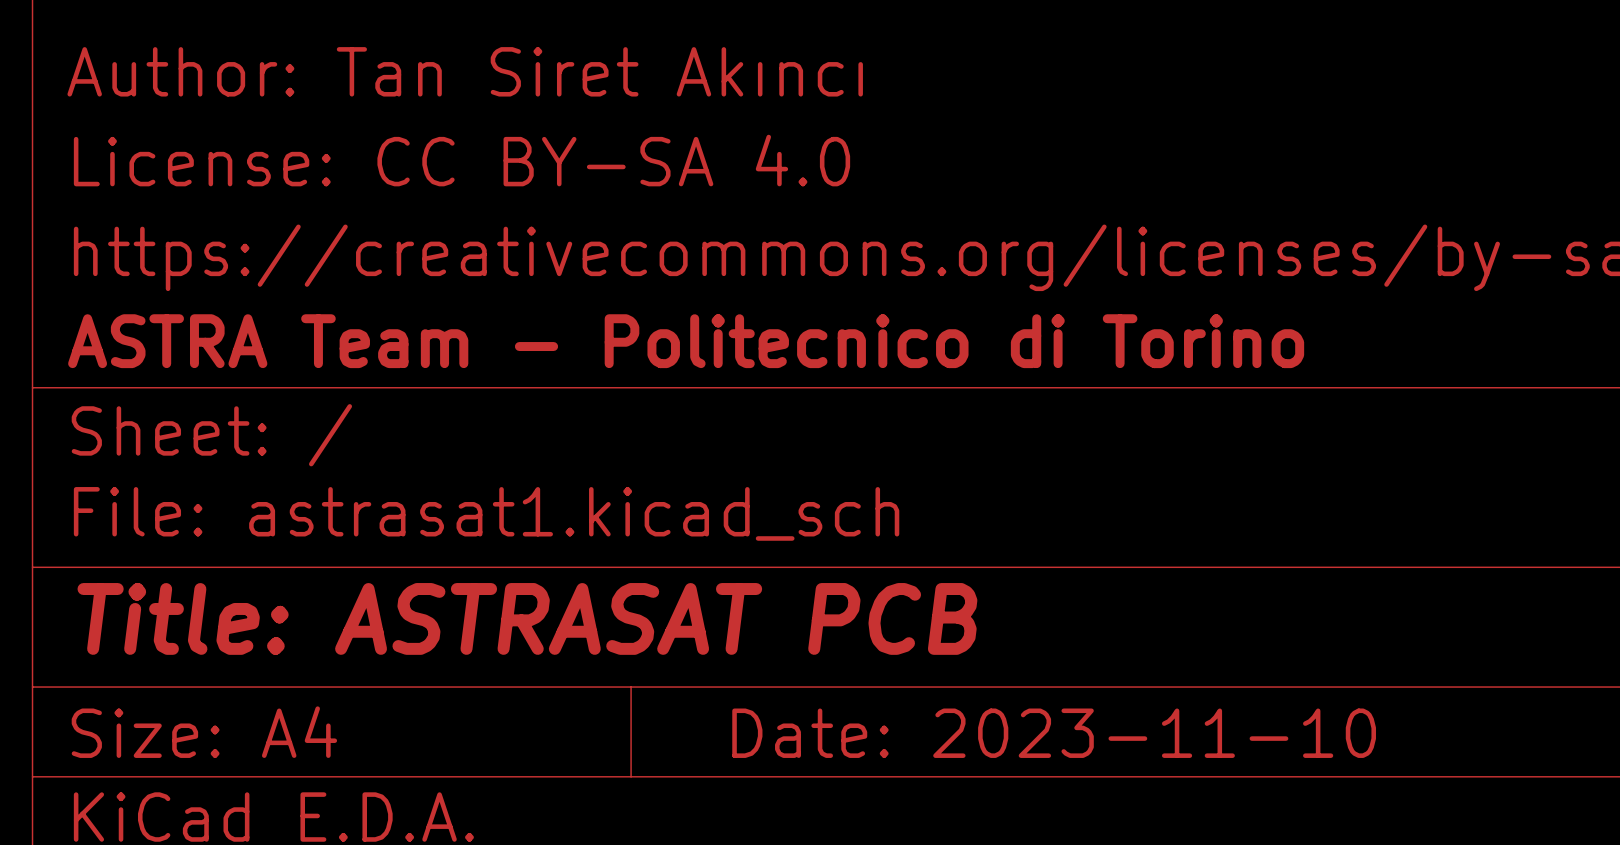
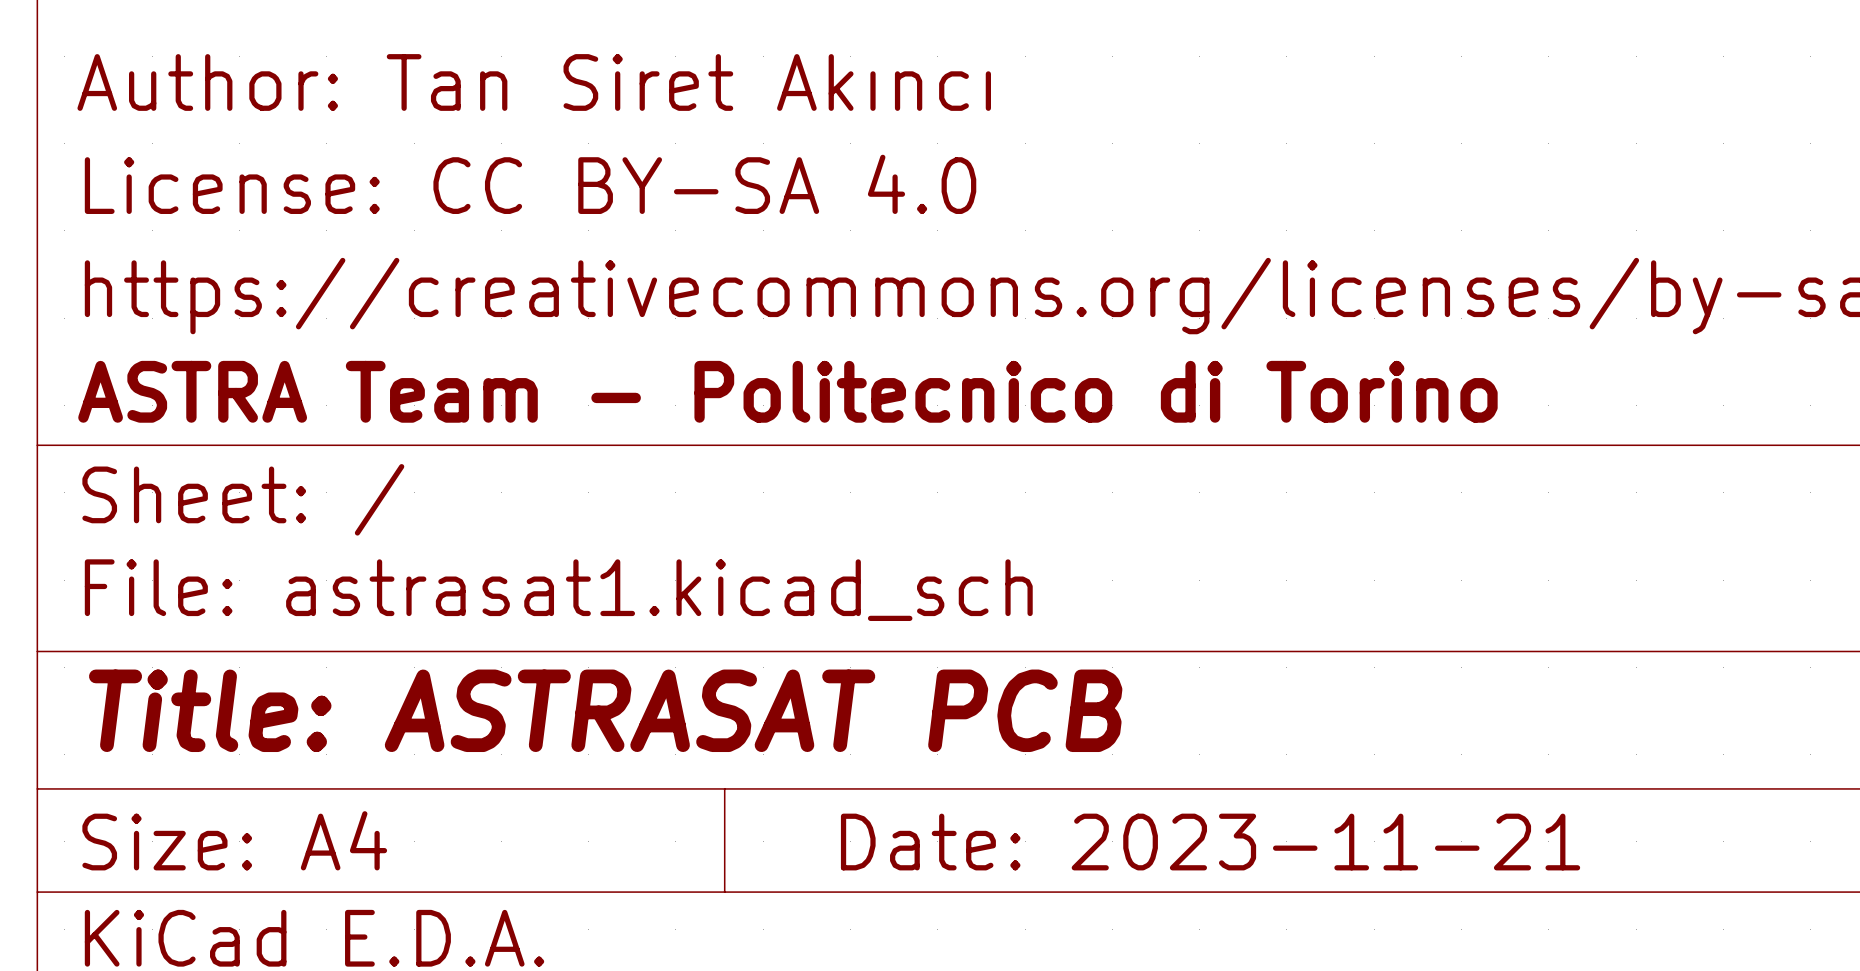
title block: Date: 2023-11-10 (1054, 733) -> Date: 2023-11-21 (1210, 842)

